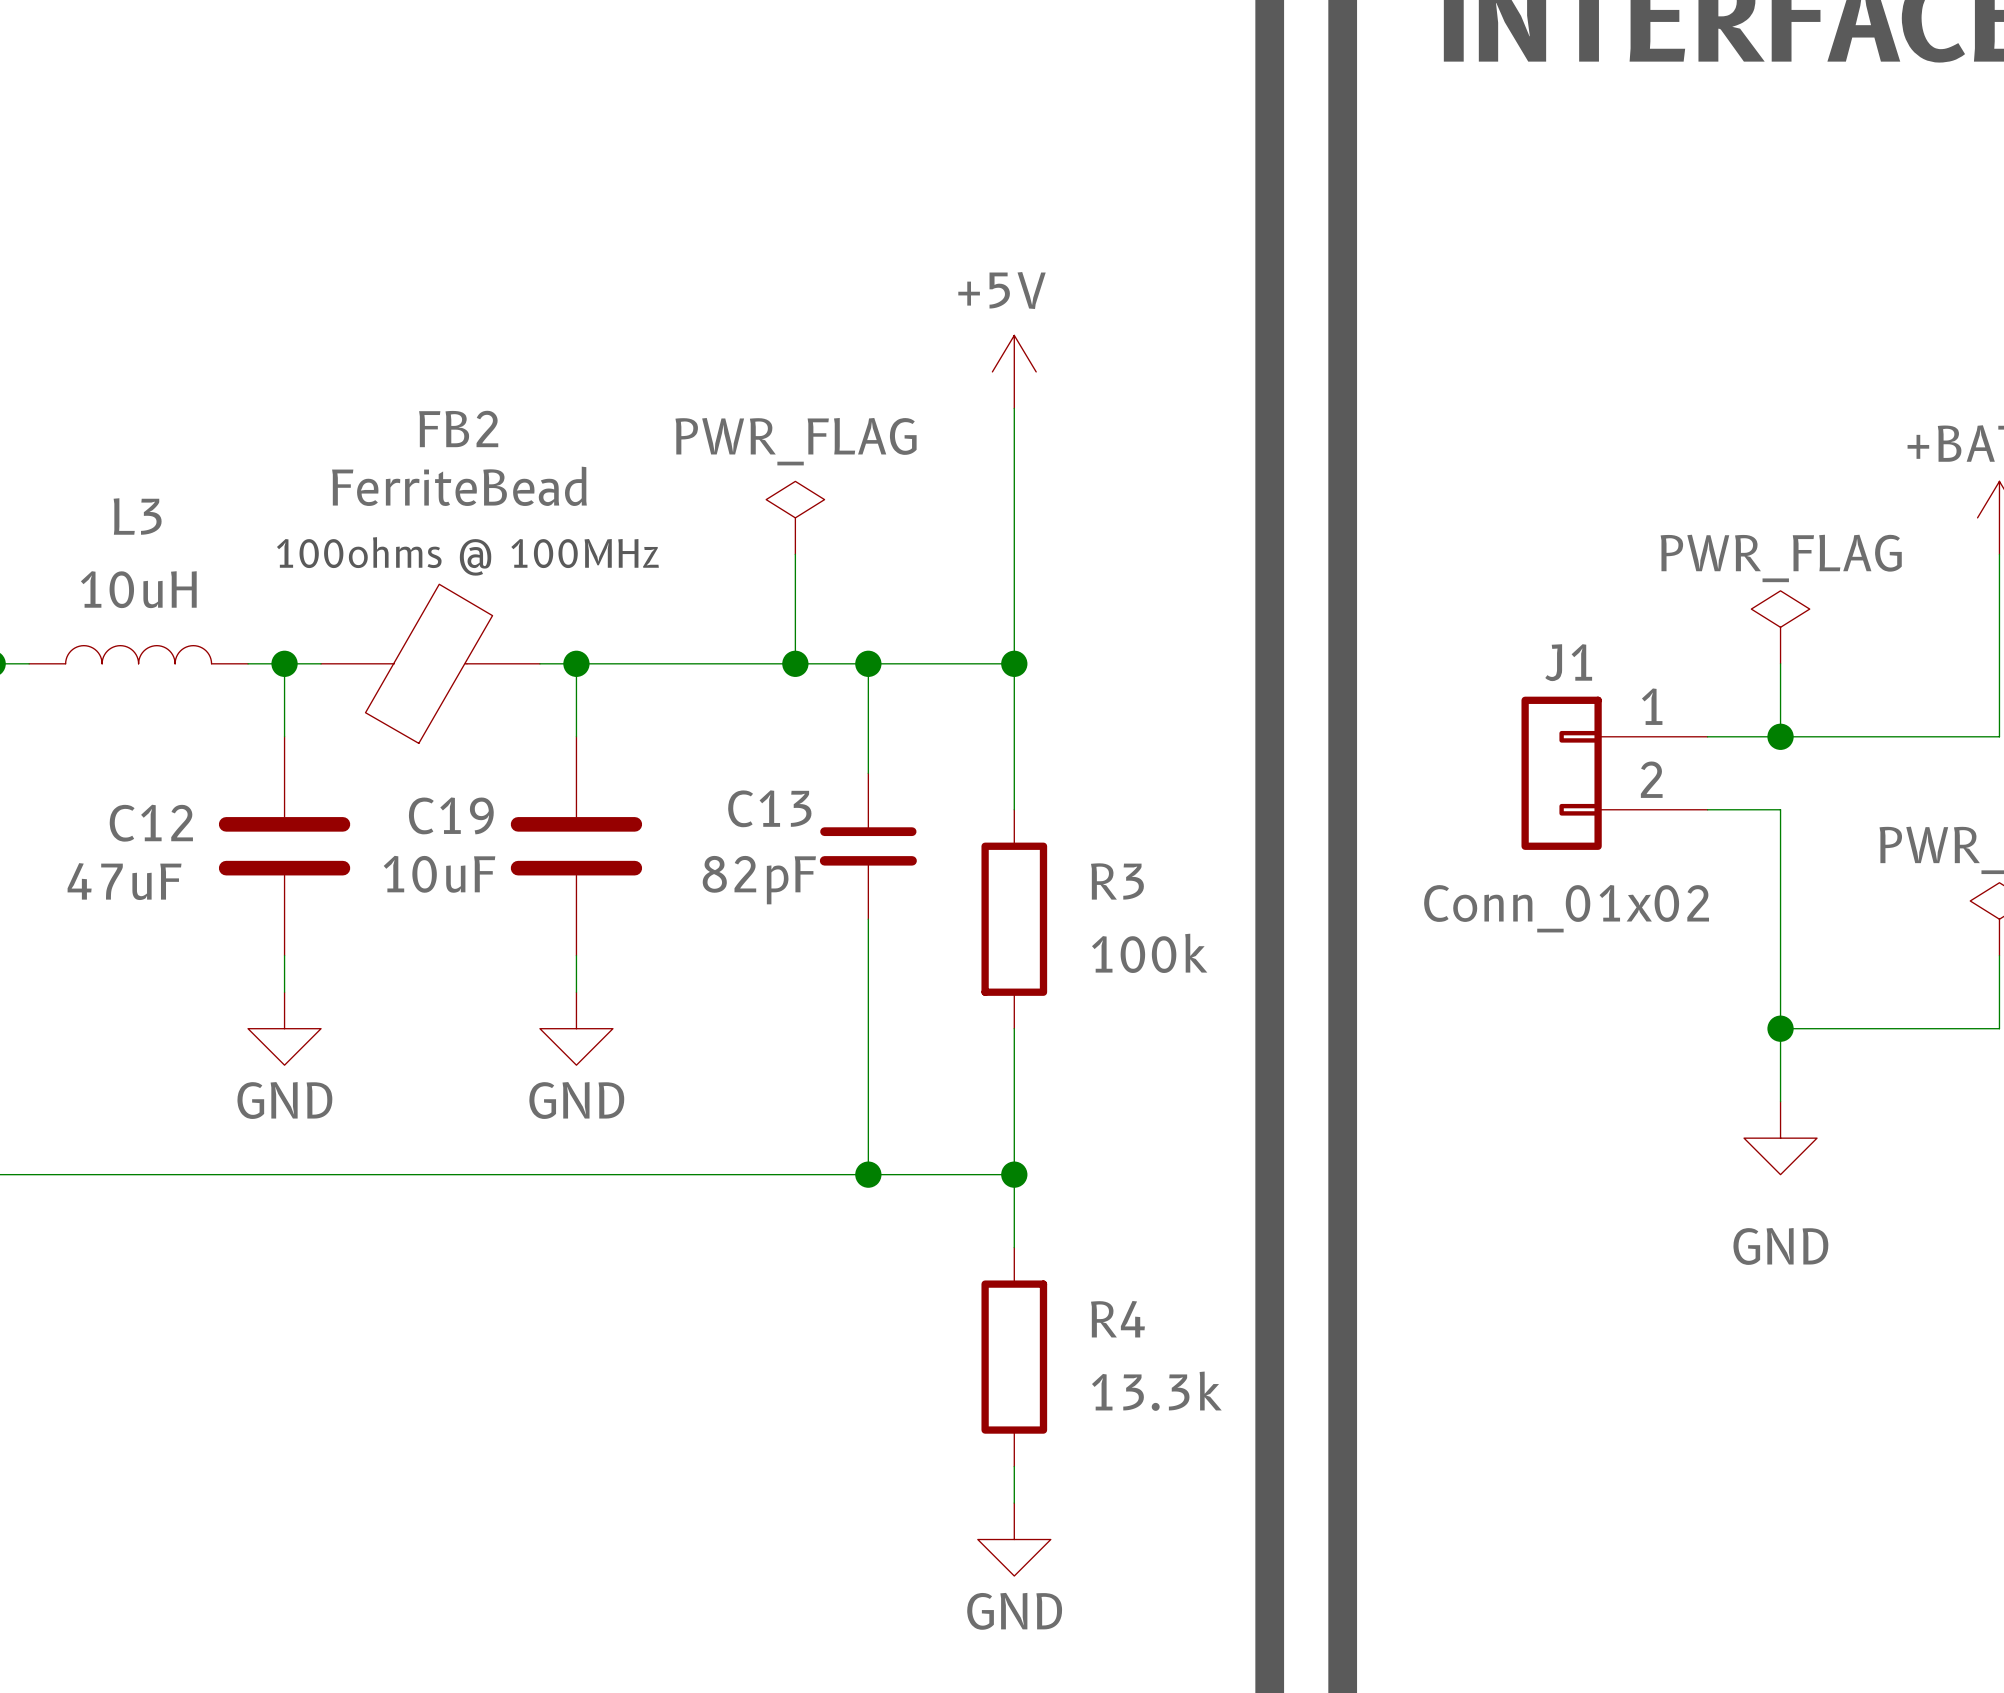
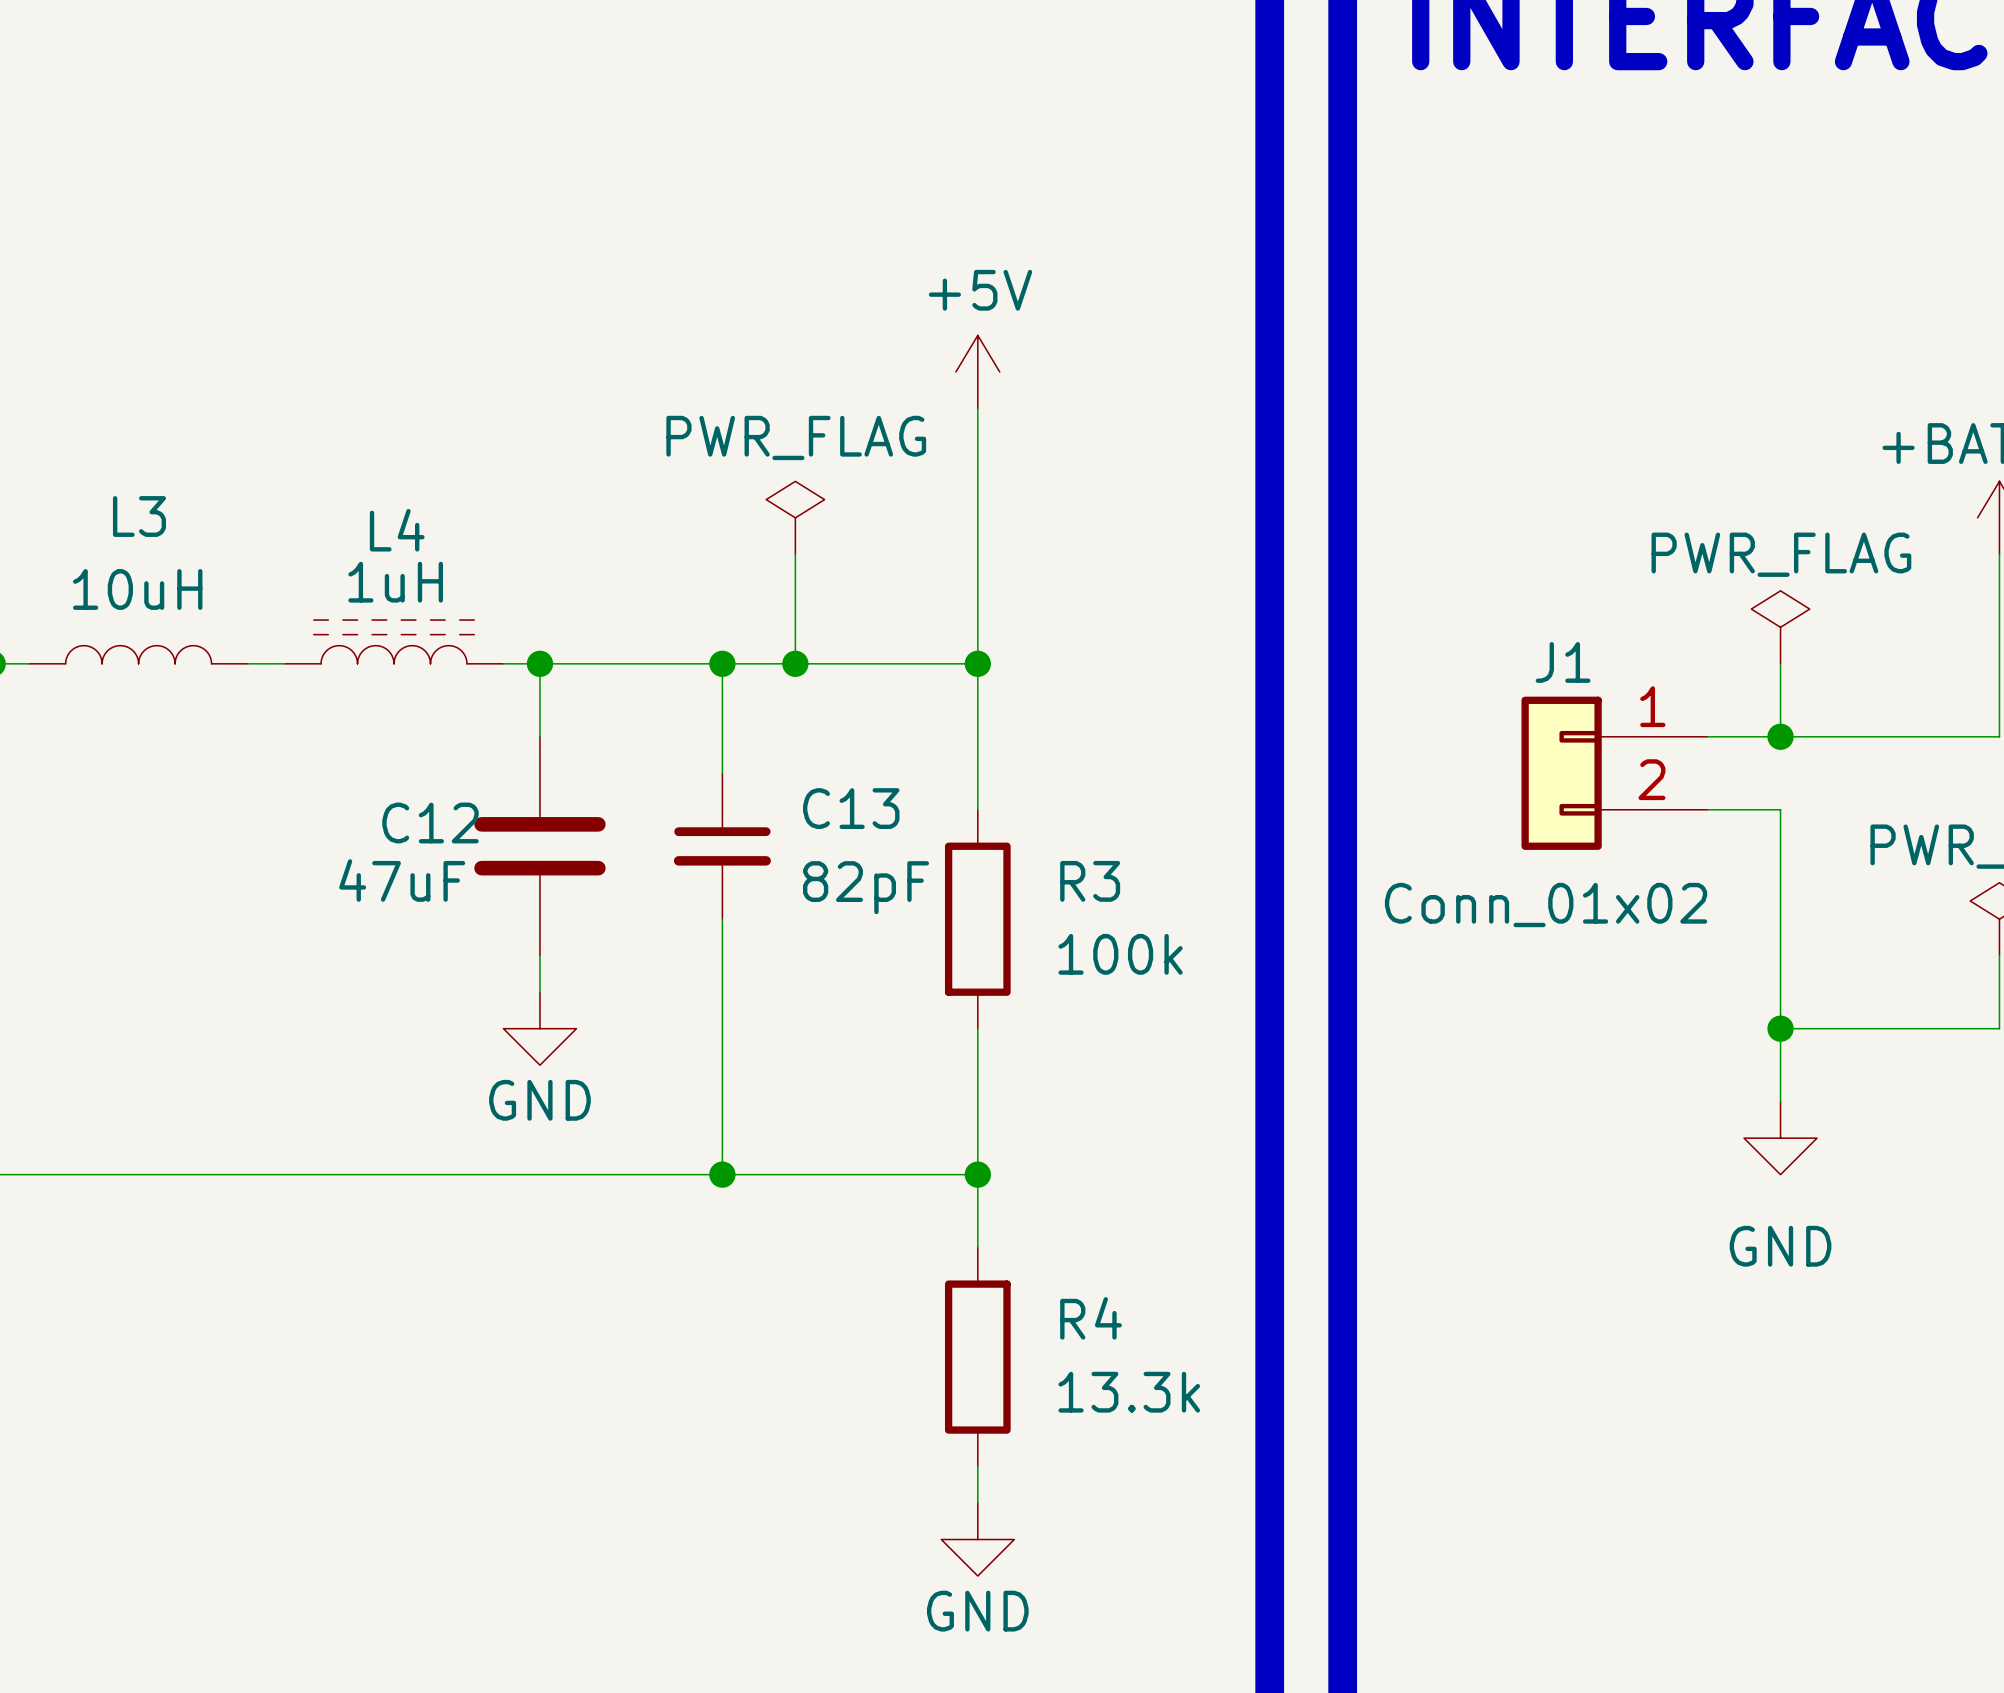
power symbol position: +5V (1014, 371) -> +5V (977, 371)
wire: (1014, 408) (1014, 809) -> (977, 408) (977, 809)
text: 100ohms @ 100MHz (467, 556) -> none
L4: none -> 1uH (394, 641)
junction: (284, 663) -> none
wire: (321, 663) (284, 663) (284, 736) -> none
FB2: FerriteBead (430, 663) -> none
wire: none -> (503, 663) (539, 663) (539, 736)
wire: (576, 663) (576, 736) -> none
junction position: (576, 663) -> (539, 663)
junction: none -> (722, 663)
wire: (868, 663) (868, 773) -> (722, 663) (722, 773)
junction: (868, 663) -> none
wire: (977, 663) (1014, 663) -> none
junction position: (1014, 663) -> (977, 663)
C13 name position: C13 (769, 808) -> C13 (851, 808)
C12 name position: C12 (151, 823) -> C12 (430, 823)
C12 position: (284, 846) -> (539, 846)
C19: 10uF (576, 846) -> none
C13 position: (868, 846) -> (722, 846)
C13 value position: 82pF (759, 880) -> 82pF (866, 887)
C12 value position: 47uF (124, 881) -> 47uF (402, 880)
wire: (868, 919) (868, 1174) -> (722, 919) (722, 1174)
R3 position: (1014, 919) -> (977, 919)
wire: (284, 955) (284, 992) -> none
wire: (576, 955) (576, 992) -> (539, 955) (539, 992)
power symbol: GND (284, 1028) -> none
power symbol position: GND (576, 1028) -> GND (539, 1028)
wire: (1014, 1028) (1014, 1247) -> (977, 1028) (977, 1247)
junction: none -> (722, 1174)
junction: (868, 1174) -> none
wire: (977, 1174) (1014, 1174) -> none
junction position: (1014, 1174) -> (977, 1174)
R4 position: (1014, 1357) -> (977, 1357)
wire: (1014, 1466) (1014, 1503) -> (977, 1466) (977, 1503)
power symbol position: GND (1014, 1539) -> GND (977, 1539)

